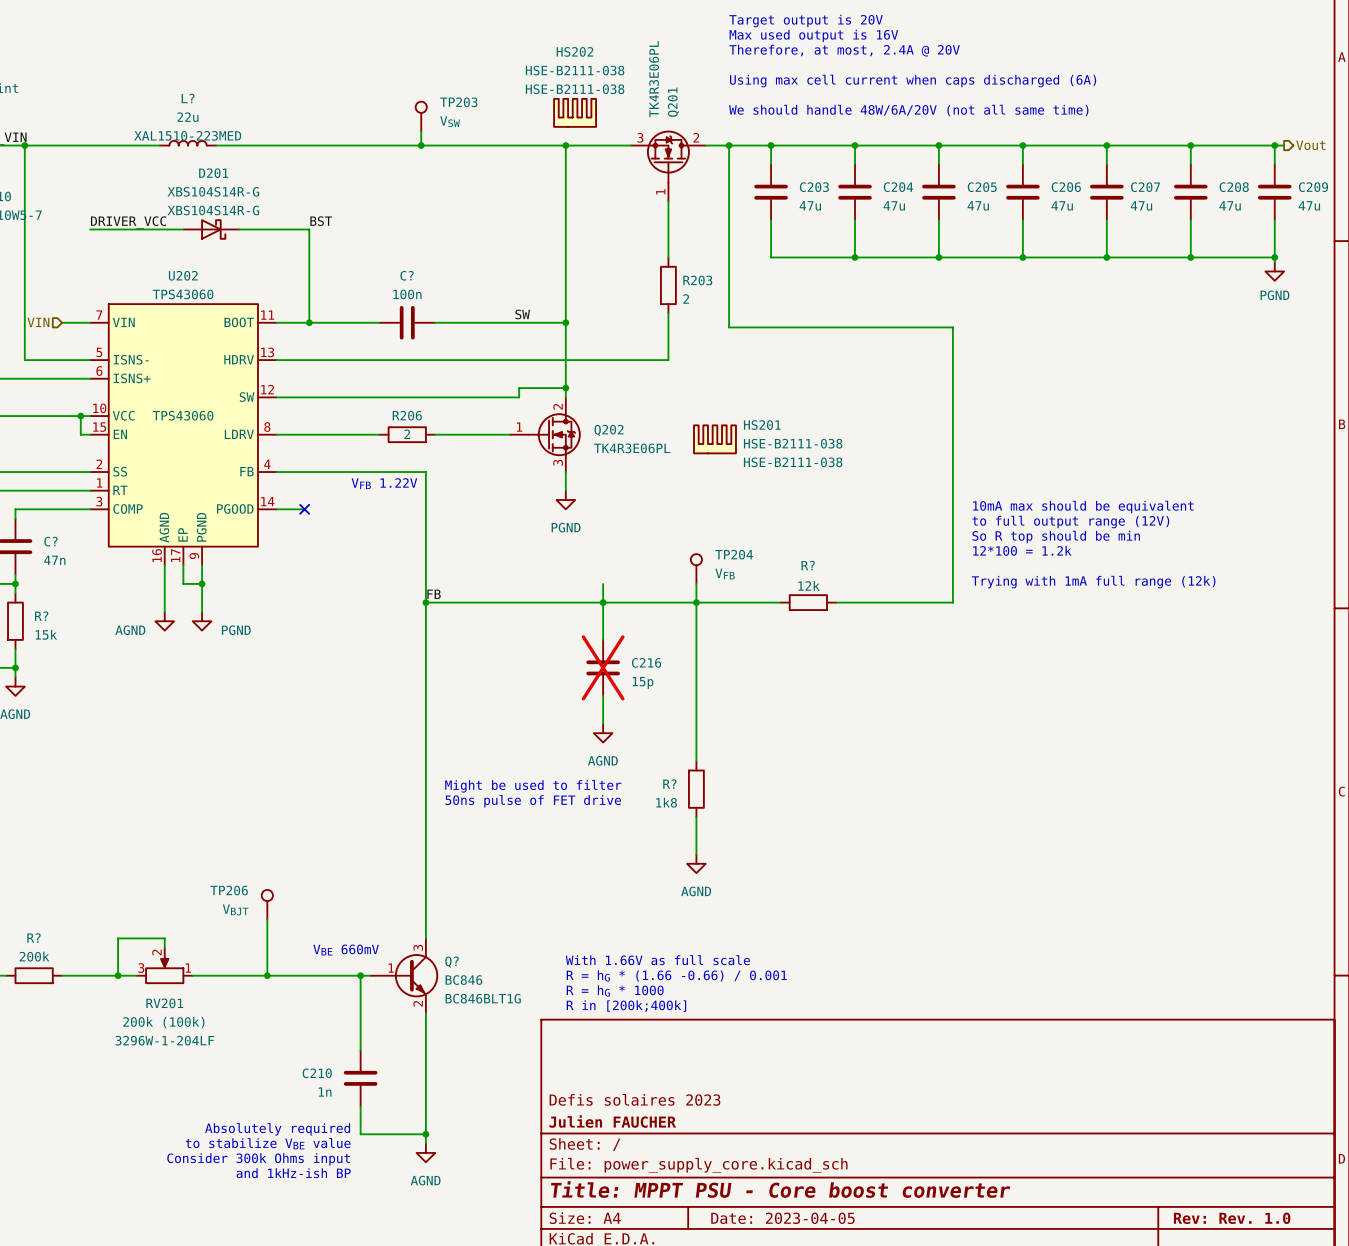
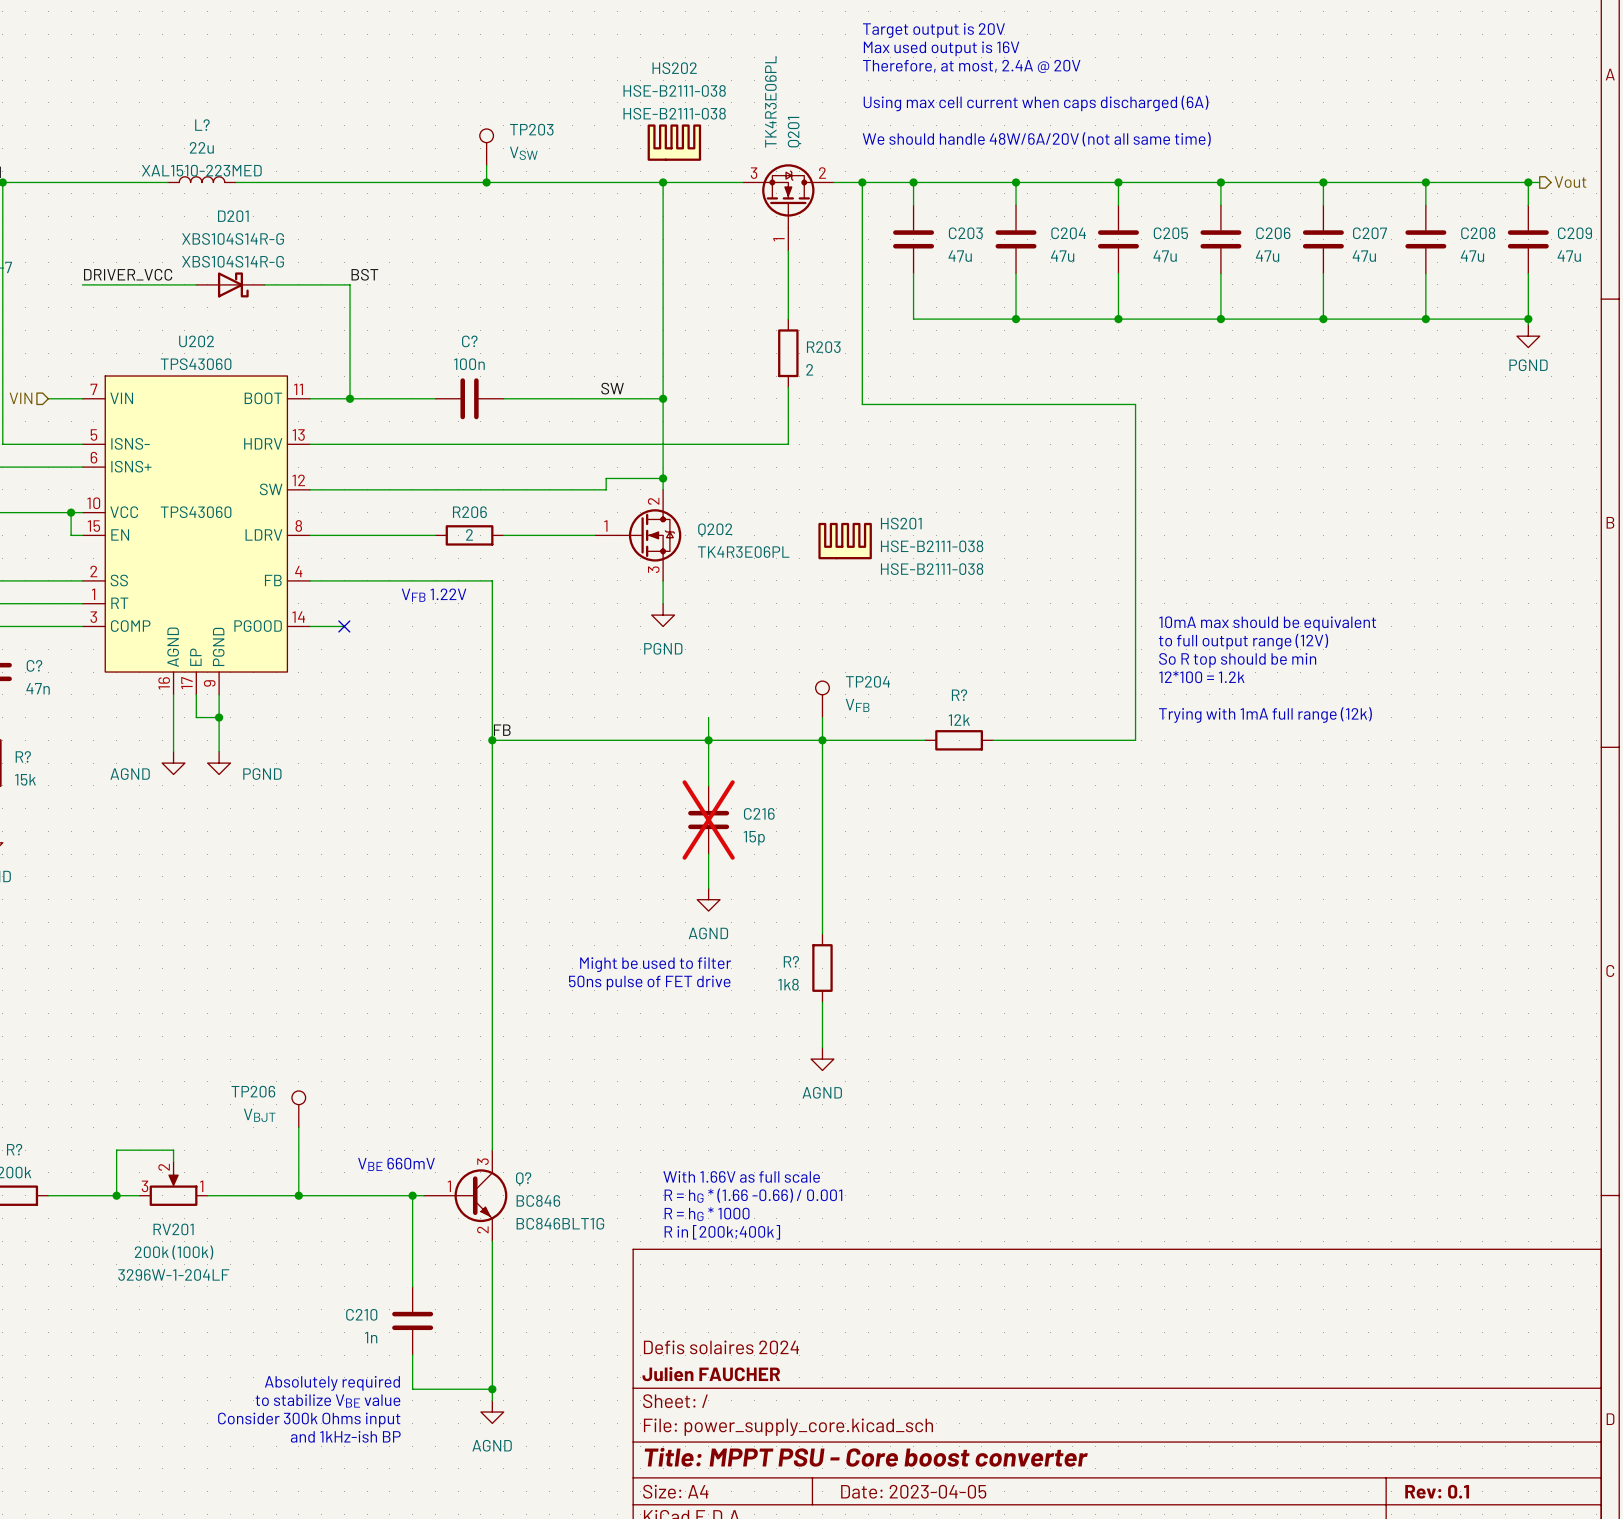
title block: Defis solaires 2023 (635, 1099) -> Defis solaires 2024 (721, 1347)
title block: Rev: Rev. 1.0 (1232, 1218) -> Rev: 0.1 (1437, 1491)

